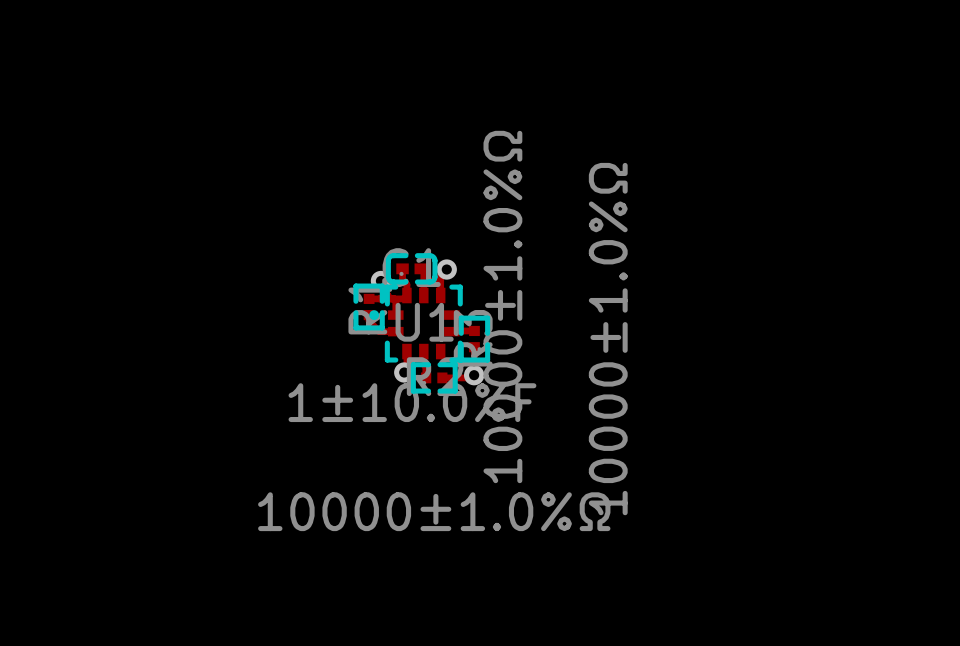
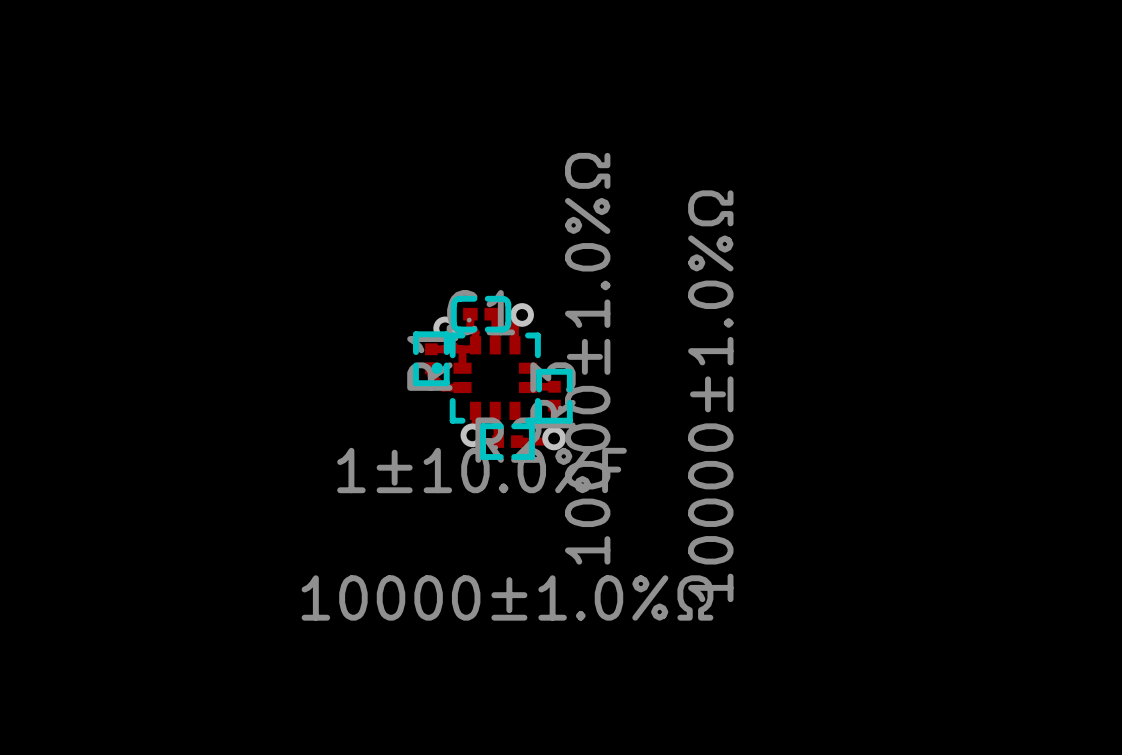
U1 name: U1 (424, 322) -> none

